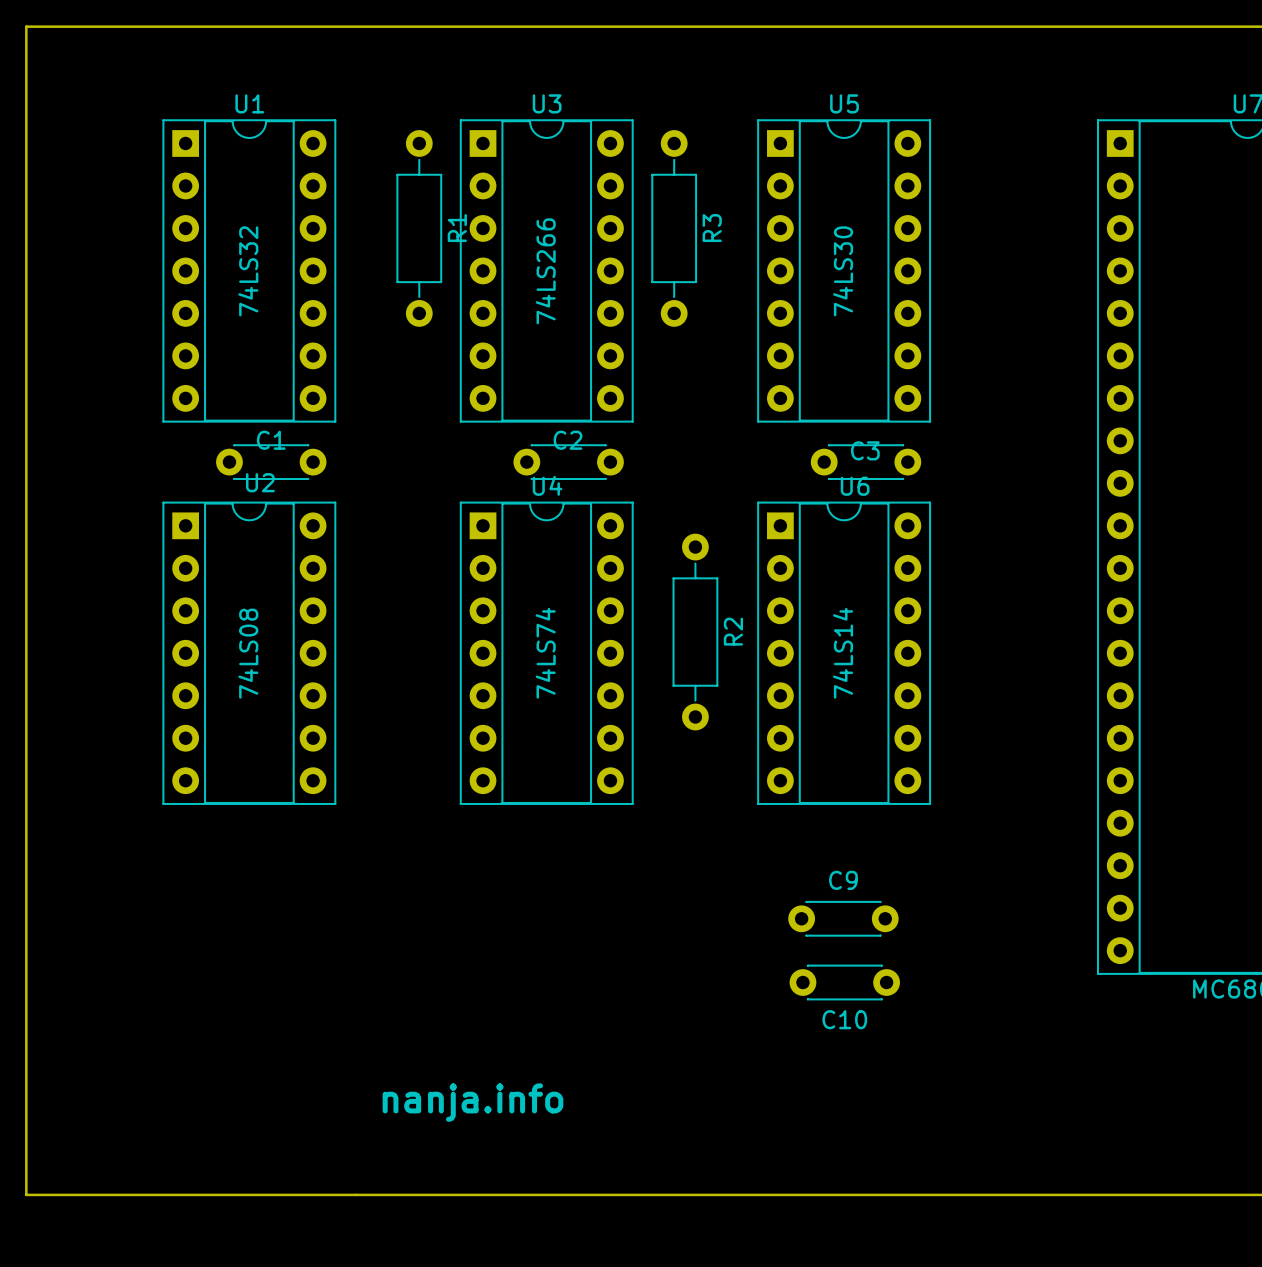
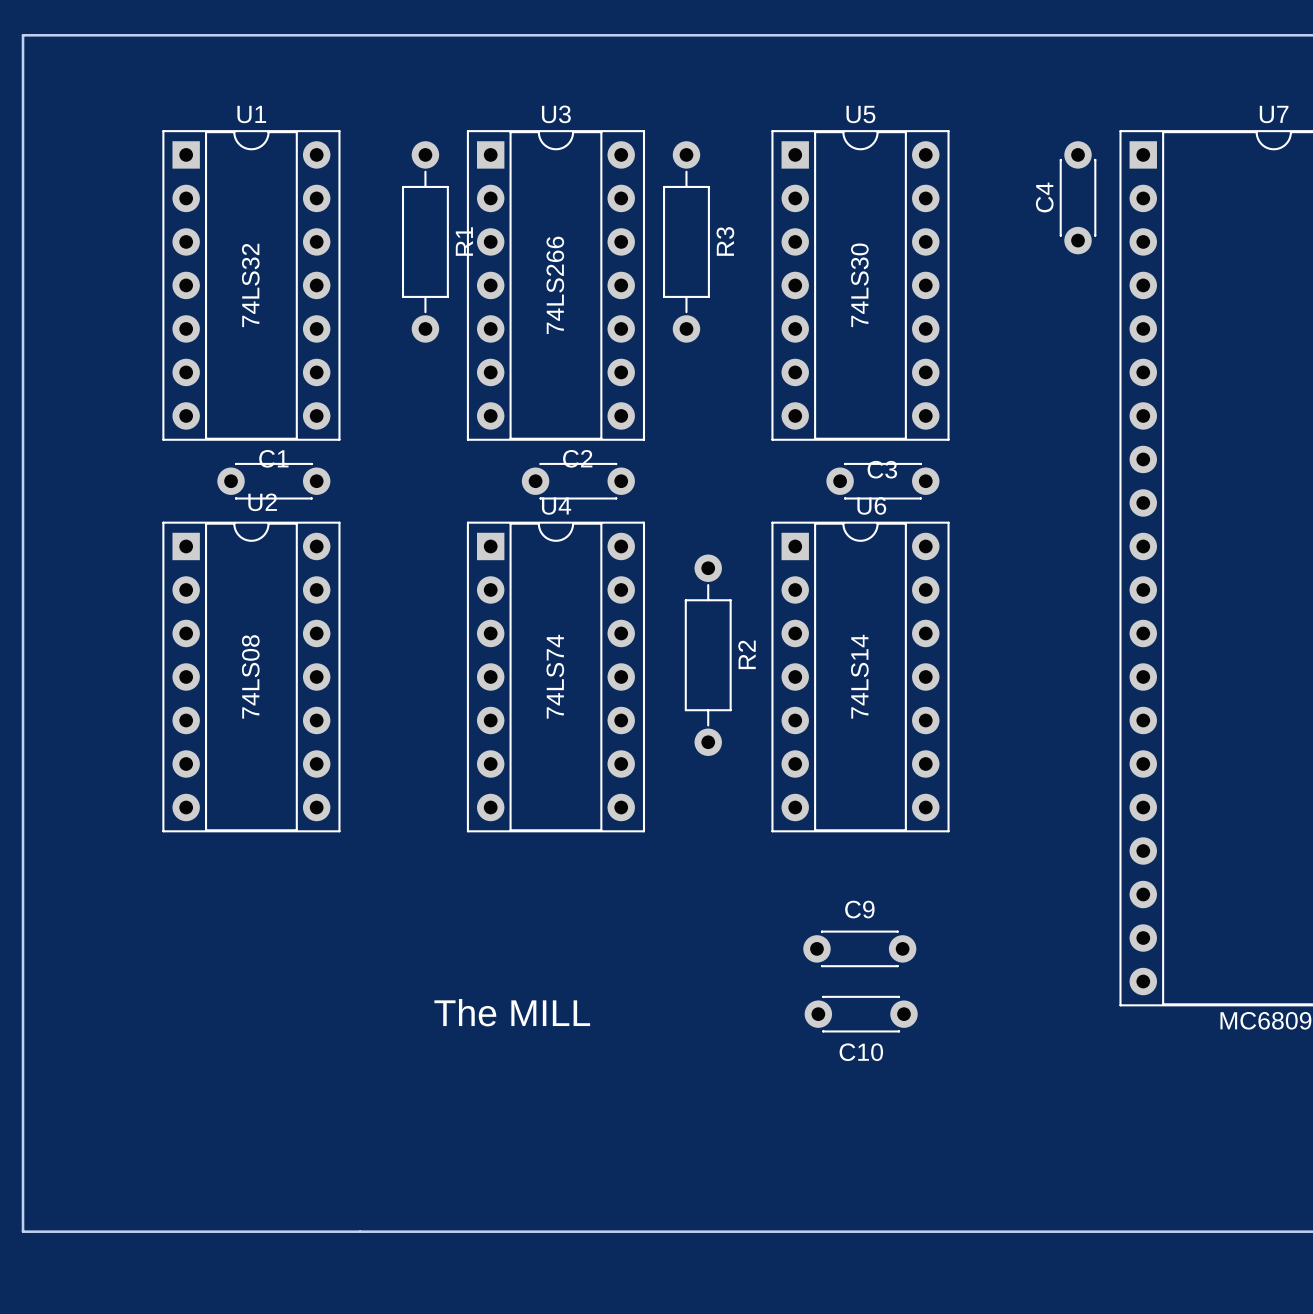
C4: none -> (1078, 197)
text: none -> The MILL (512, 1012)
text: nanja.info (472, 1102) -> none

